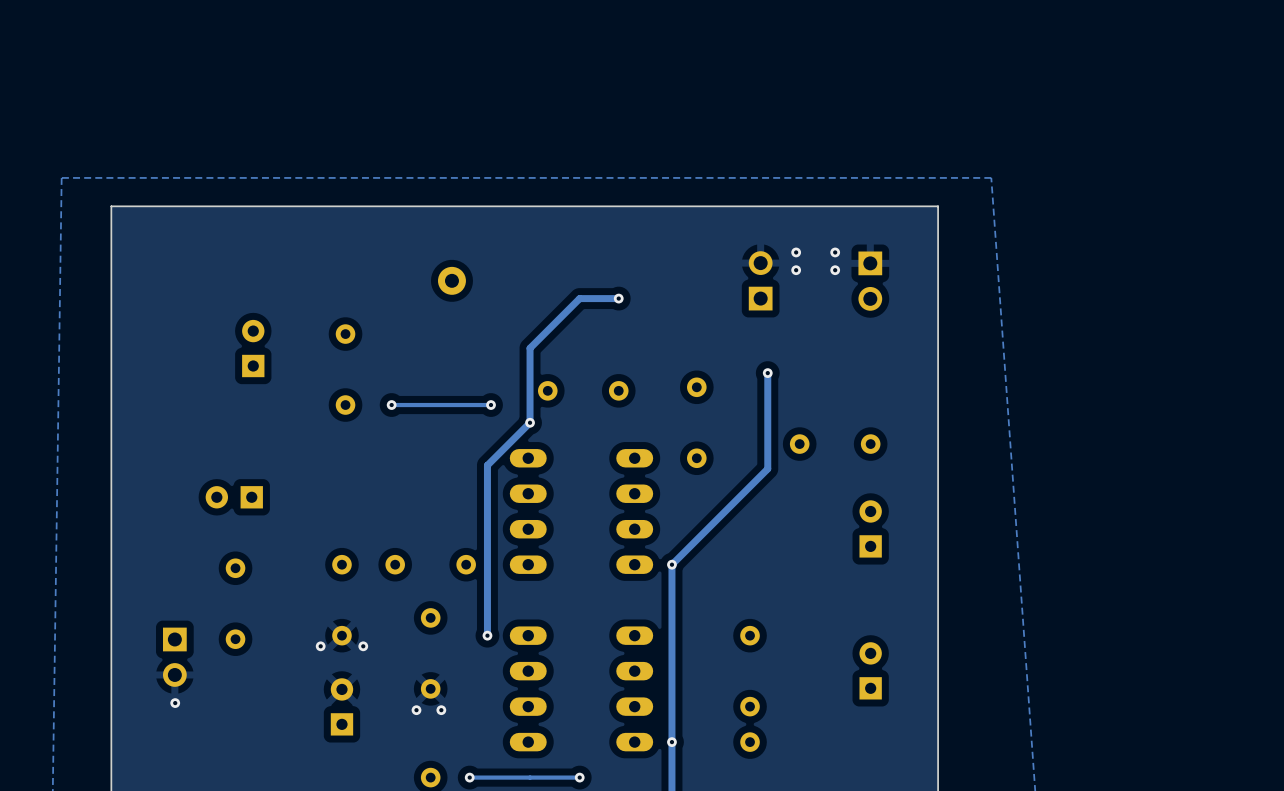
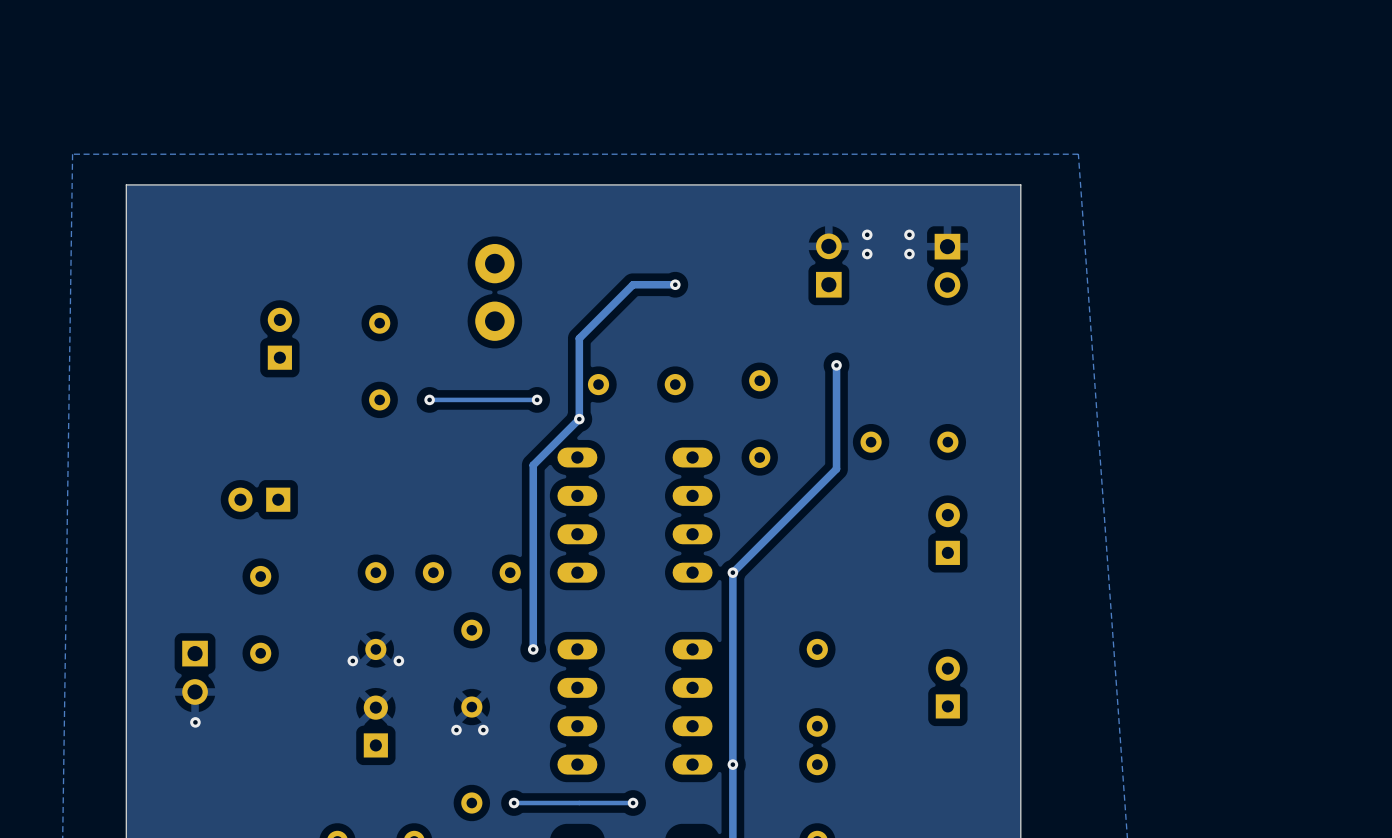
part: (451, 280) -> none
part: none -> (494, 292)

